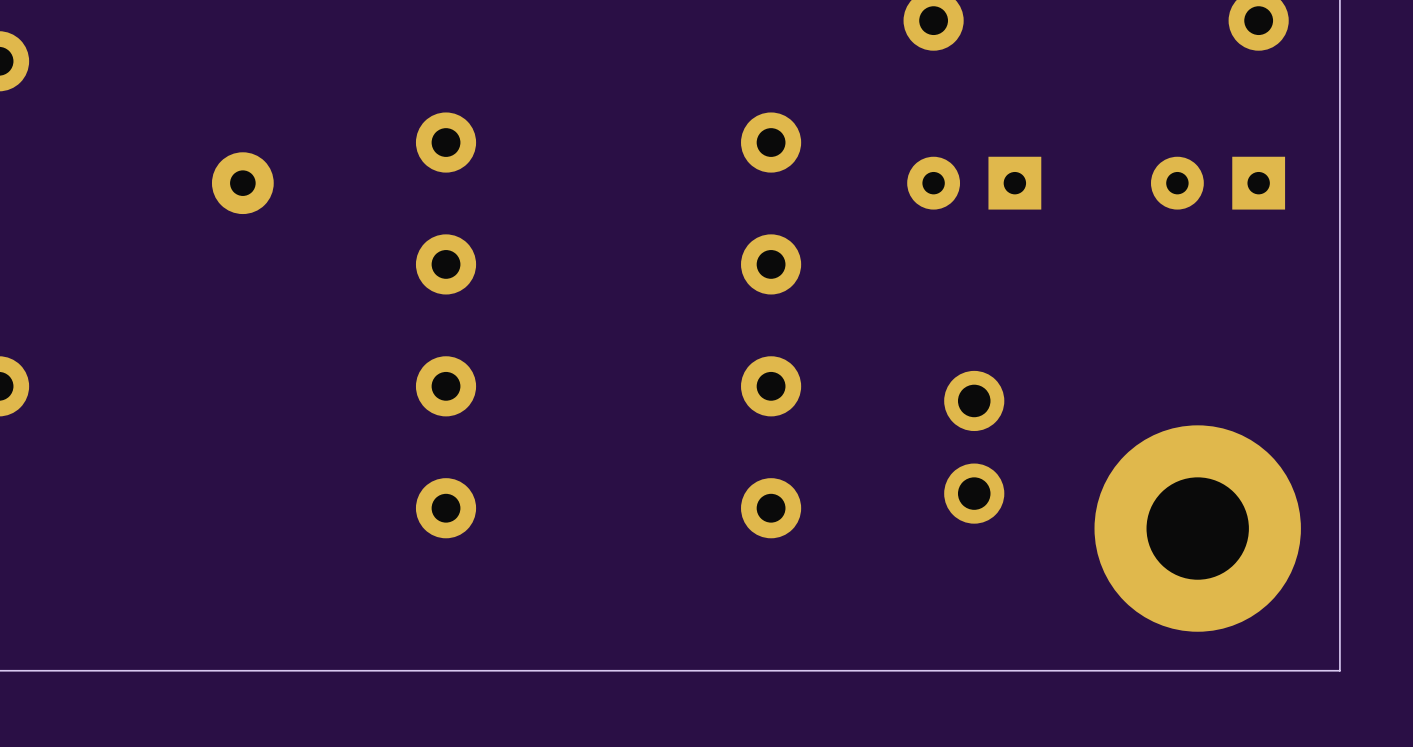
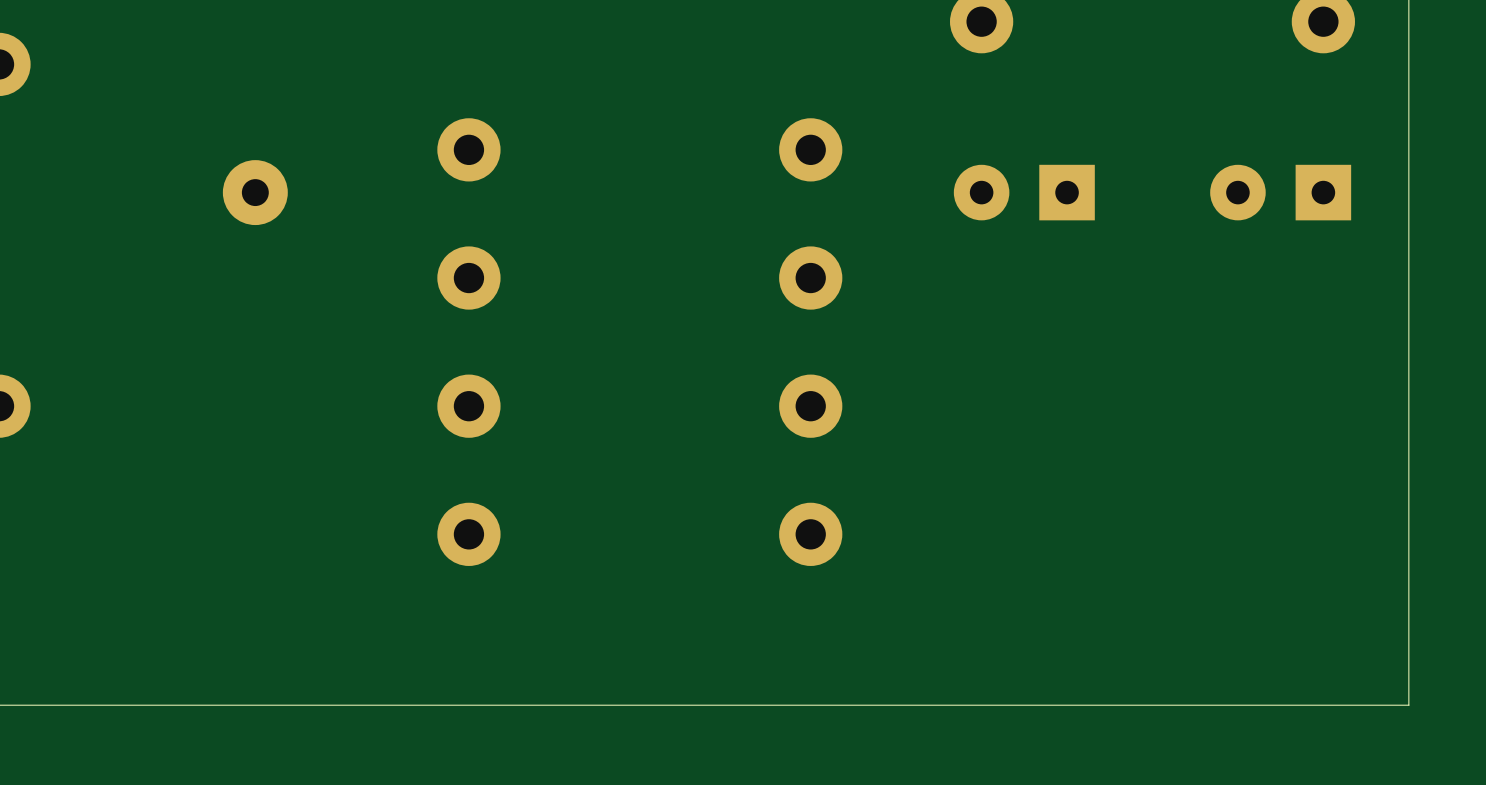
part: (974, 447) -> none
part: (1197, 528) -> none

